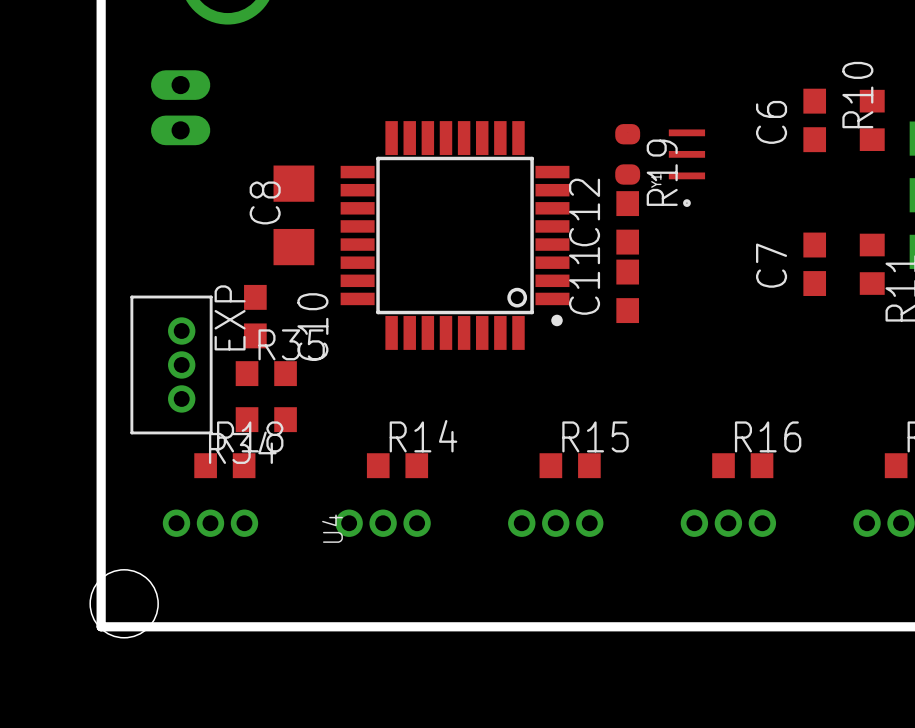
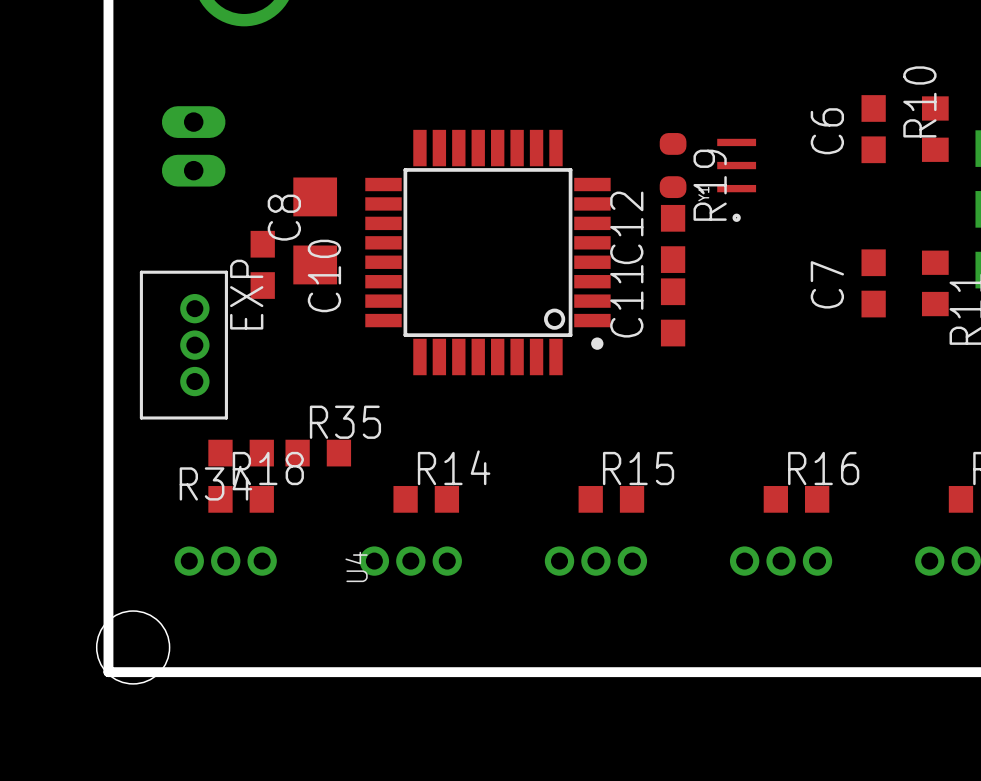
part position: (180, 107) -> (193, 146)
C10 position: (255, 316) -> (262, 264)
EXP position: (171, 364) -> (183, 345)
R35 position: (266, 373) -> (318, 453)
R34 position: (266, 419) -> (241, 453)

